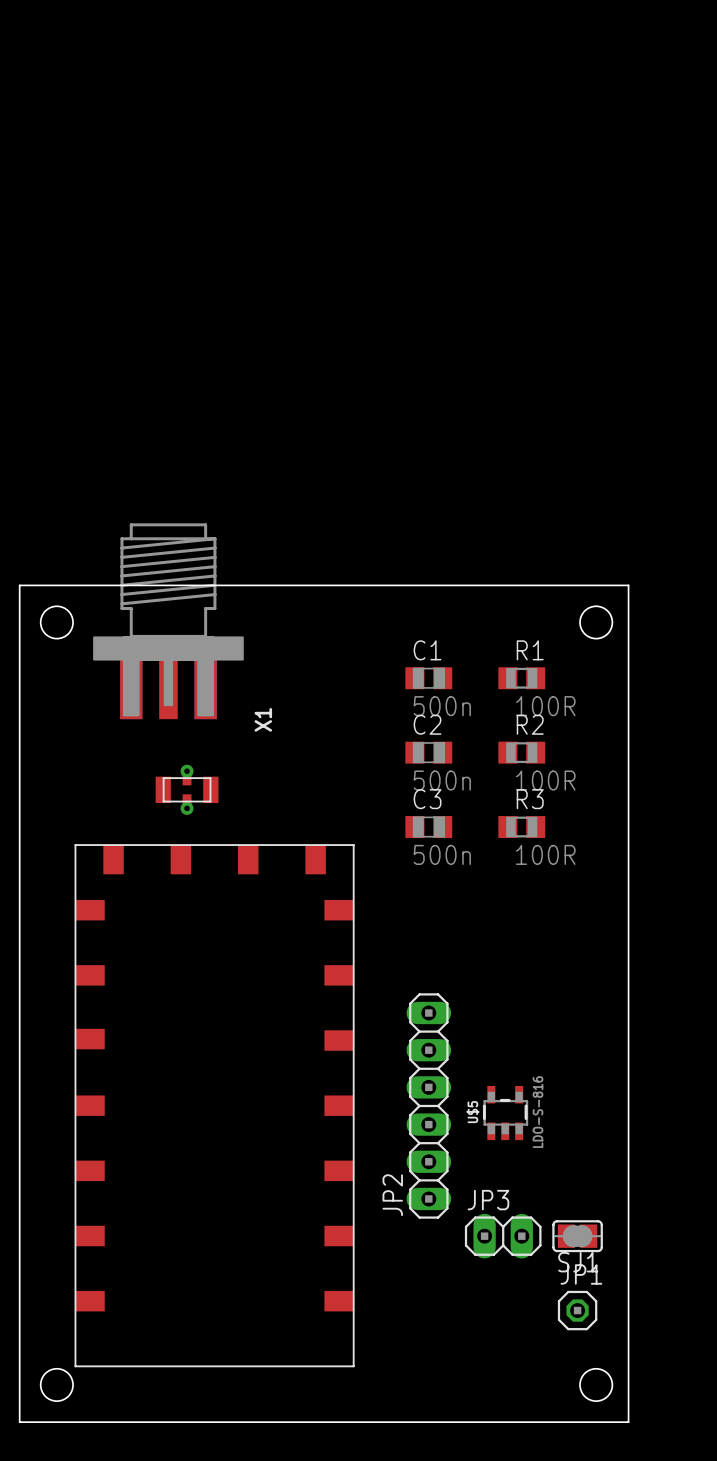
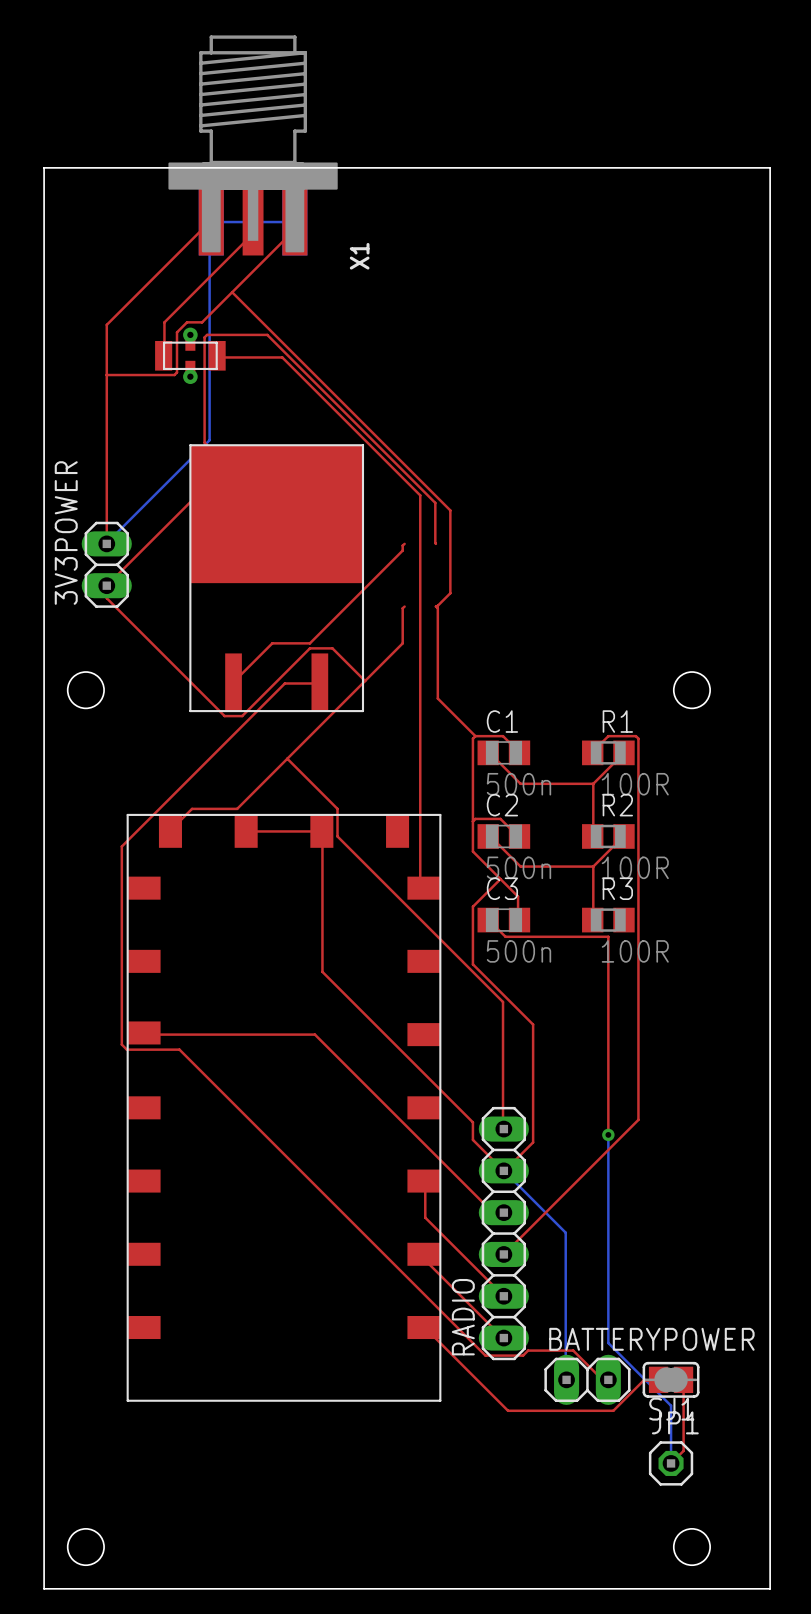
top track: none -> (211, 222) (106, 324) (106, 543)
top track: none -> (253, 222) (252, 234) (164, 322) (163, 355)
top track: none -> (294, 222) (294, 229) (202, 322) (187, 322) (177, 332) (177, 372) (174, 375) (106, 375)
bottom track: none -> (294, 222) (209, 222) (209, 440) (106, 543)
top track: none -> (232, 292) (450, 510) (450, 593) (435, 606) (437, 608) (437, 698) (475, 736)
part: none -> (190, 355)
top track: none -> (217, 355) (217, 357) (282, 357) (420, 495) (420, 884) (423, 888)
top track: none -> (404, 543) (402, 550) (309, 643) (272, 643) (233, 682)
top track: none -> (435, 543) (435, 502) (267, 334) (207, 334) (204, 337) (204, 442) (276, 514) (227, 465) (106, 585) (106, 598) (224, 716) (242, 716) (309, 648) (332, 648) (365, 680)
3V3POWER: none -> (106, 564)
part: none -> (276, 578)
top track: none -> (404, 606) (402, 608) (402, 643) (237, 808) (192, 808) (170, 831)
board edge: (19, 585) (628, 585) (628, 1422) -> (44, 648) (44, 167) (770, 167) (770, 1588) (728, 1588)
top track: none -> (319, 682) (284, 683) (121, 846) (121, 1044) (126, 1049) (179, 1049) (485, 1355) (523, 1355) (528, 1350) (573, 1350) (600, 1378) (608, 1378) (608, 1379)
X1 position: (168, 621) -> (253, 145)
top track: none -> (475, 736) (503, 736) (519, 752)
top track: none -> (475, 736) (472, 738) (472, 851) (518, 896) (519, 920)
top track: none -> (488, 752) (520, 783) (593, 783)
top track: none -> (592, 752) (608, 736) (635, 736) (638, 738) (638, 1119) (503, 1254)
top track: none -> (623, 752) (593, 783)
top track: none -> (287, 758) (337, 808) (337, 836) (503, 1001) (503, 1129)
top track: none -> (593, 783) (592, 836)
top track: none -> (472, 821) (475, 818) (500, 818) (519, 836)
top track: none -> (246, 831) (322, 831) (322, 971) (472, 1122) (472, 1139) (503, 1170) (533, 1142) (533, 1024) (472, 964) (472, 906) (500, 879)
top track: none -> (488, 836) (490, 836) (520, 866) (593, 866)
top track: none -> (623, 836) (593, 866)
top track: none -> (593, 866) (592, 920)
part: (187, 789) -> none
top track: none -> (488, 920) (505, 936) (608, 936) (608, 1134)
top track: none -> (144, 1032) (144, 1034) (314, 1034) (492, 1212) (503, 1212)
bottom track: none -> (608, 1134) (608, 1343) (671, 1405) (671, 1463)
via: none -> (608, 1134)
bottom track: none -> (503, 1170) (565, 1232) (566, 1379)
top track: none -> (423, 1181) (425, 1217) (503, 1296)
part position: (214, 1105) -> (284, 1107)
U$5: LDO-S-816 (505, 1113) -> none
top track: none -> (423, 1254) (425, 1260) (503, 1338)
top track: none -> (423, 1327) (508, 1410) (613, 1410) (643, 1380) (658, 1379)
JP2 name: JP2 (392, 1195) -> RADIO (463, 1317)
JP3 name: JP3 (488, 1200) -> BATTERYPOWER (651, 1339)
top track: none -> (683, 1379) (683, 1450) (671, 1463)

